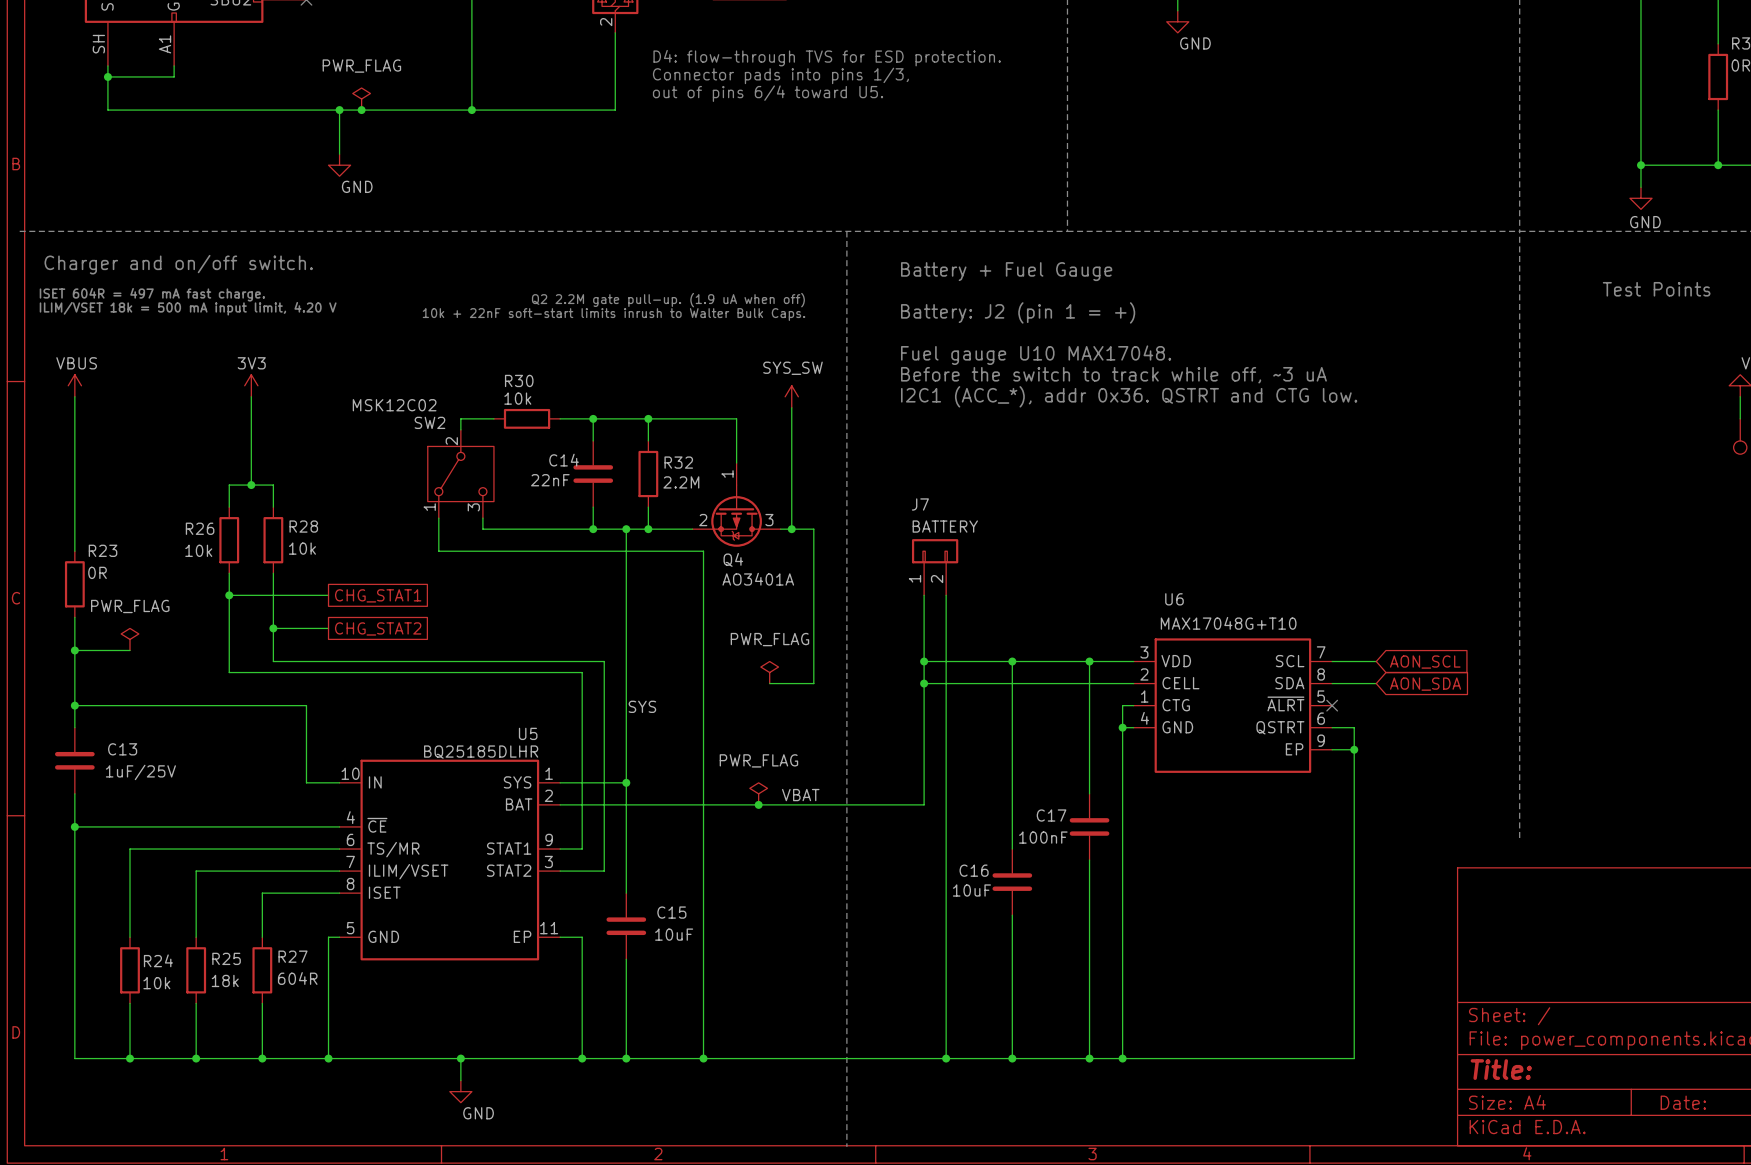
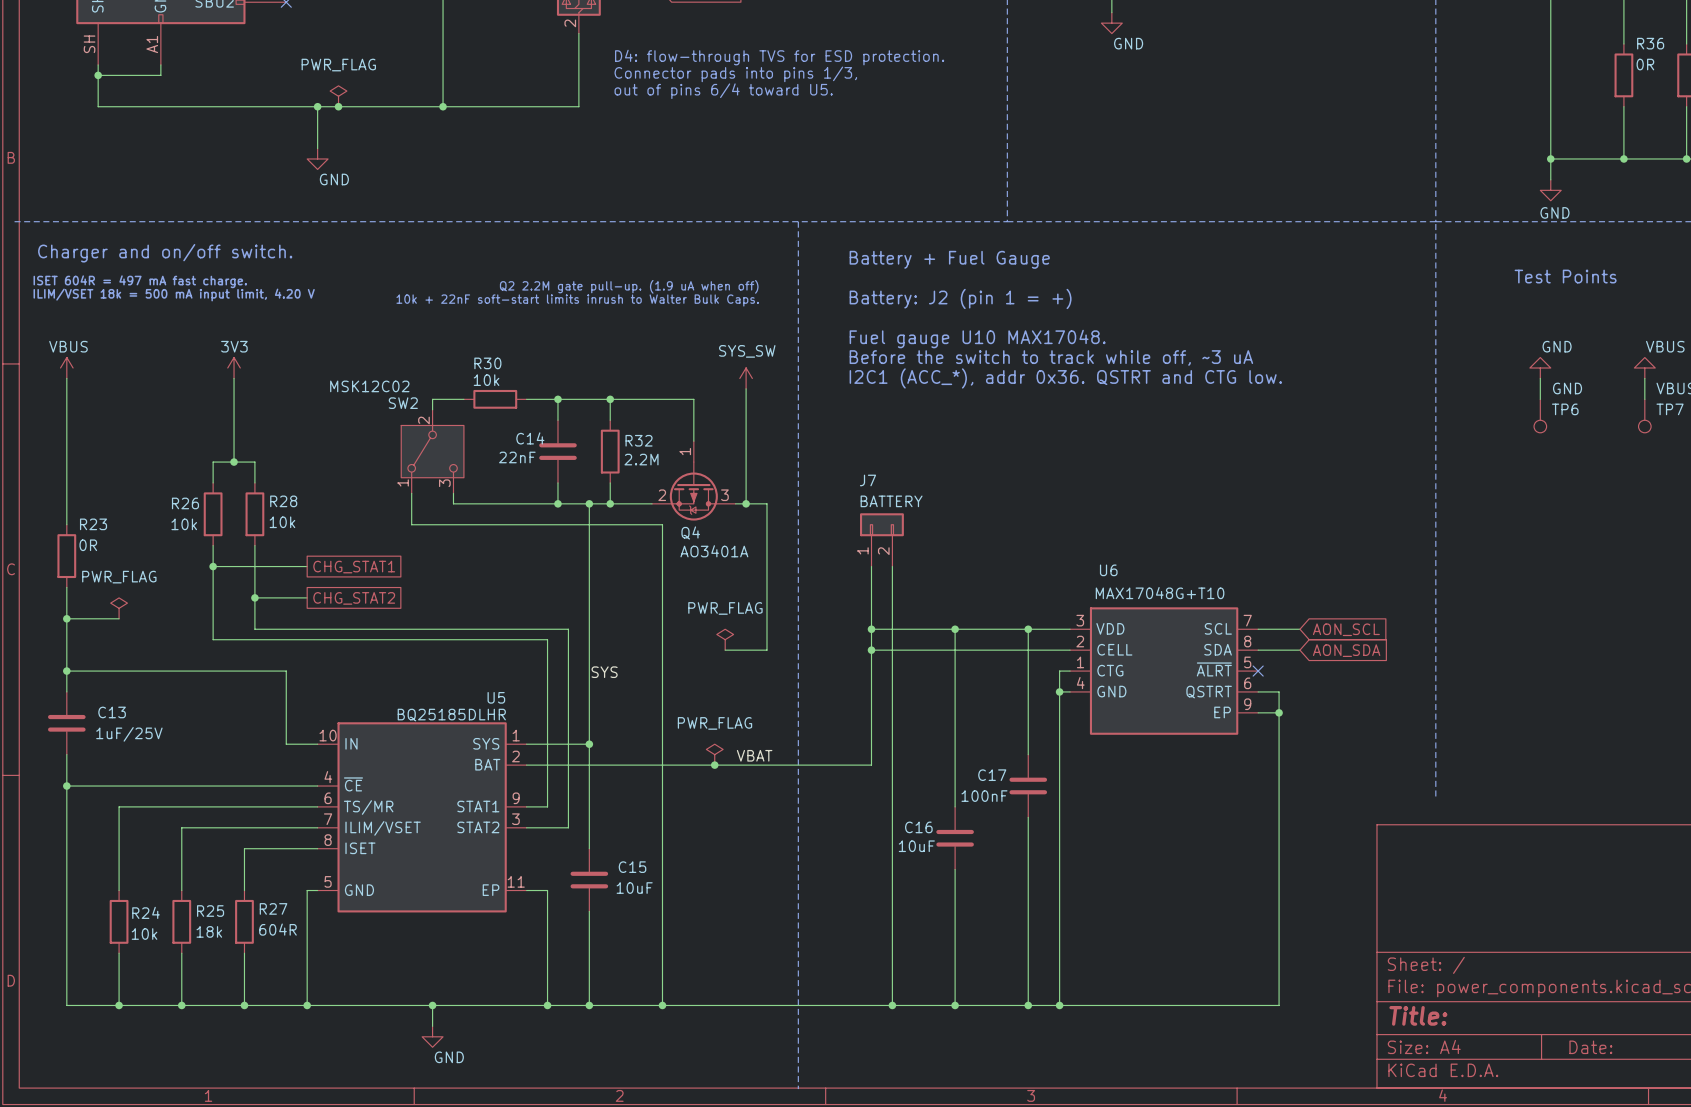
power symbol: none -> GND (1540, 367)
wire: none -> (1540, 378) (1540, 399)
TP6: none -> GND (1540, 416)

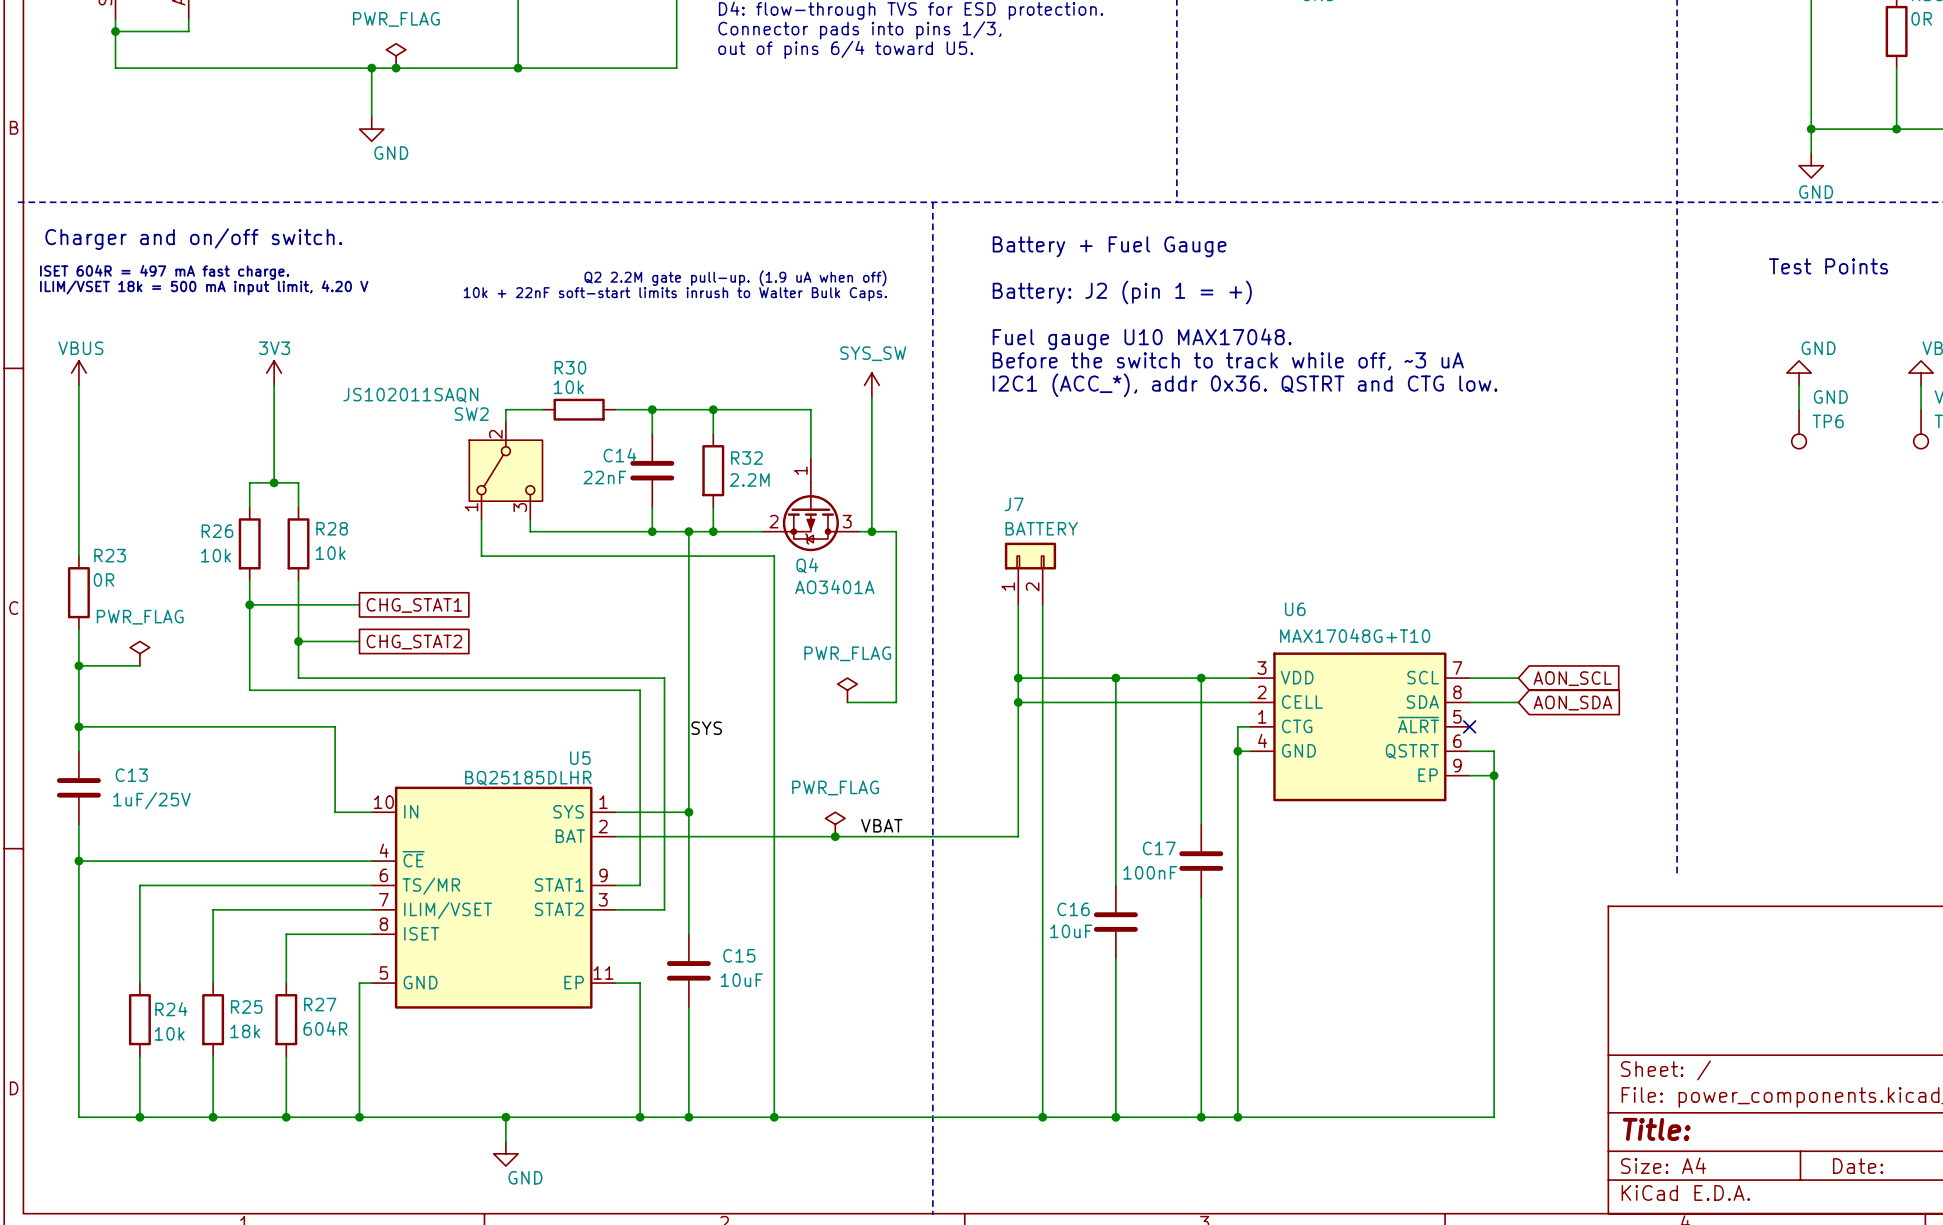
SW2 value: MSK12C02 (369, 386) -> JS102011SAQN (410, 395)

